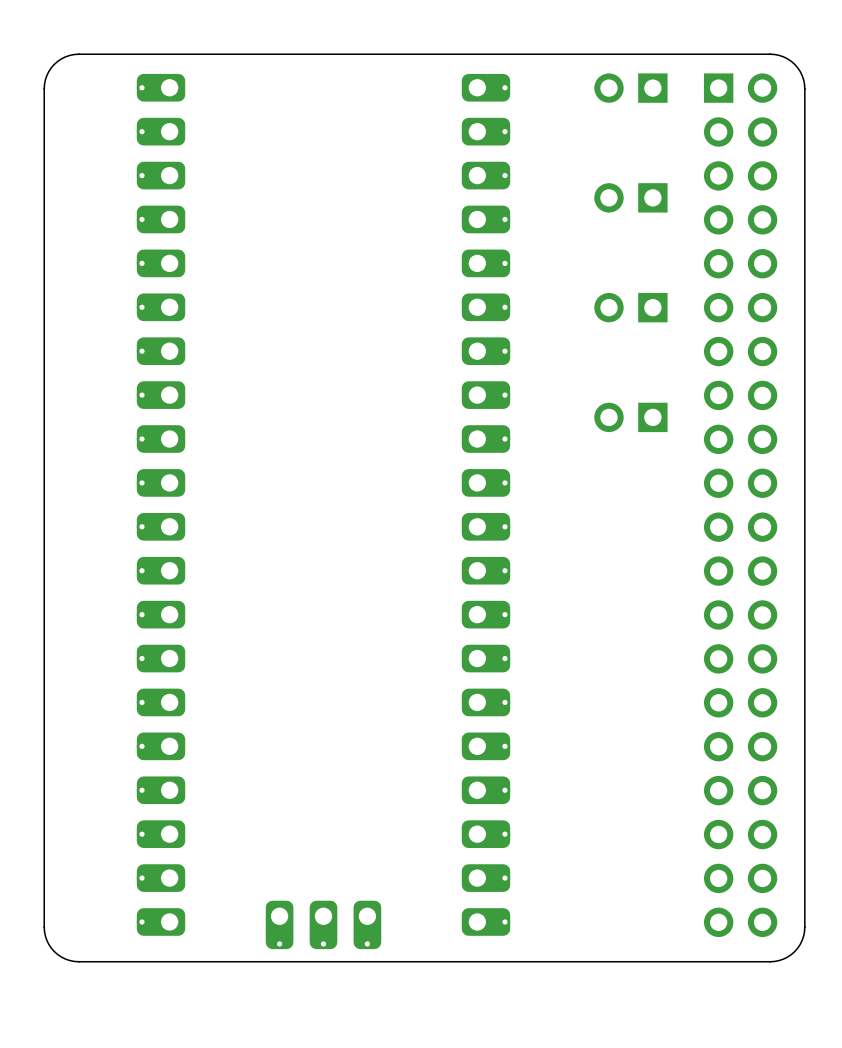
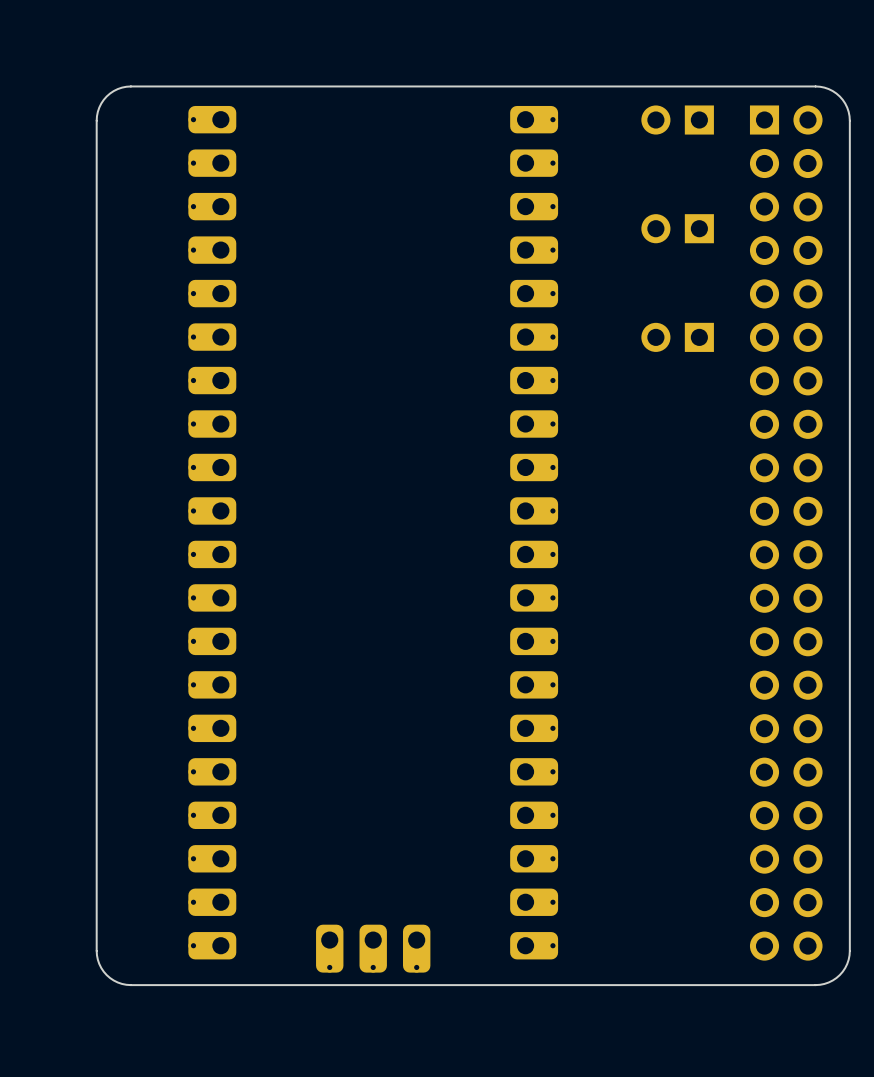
part: (630, 417) -> none

